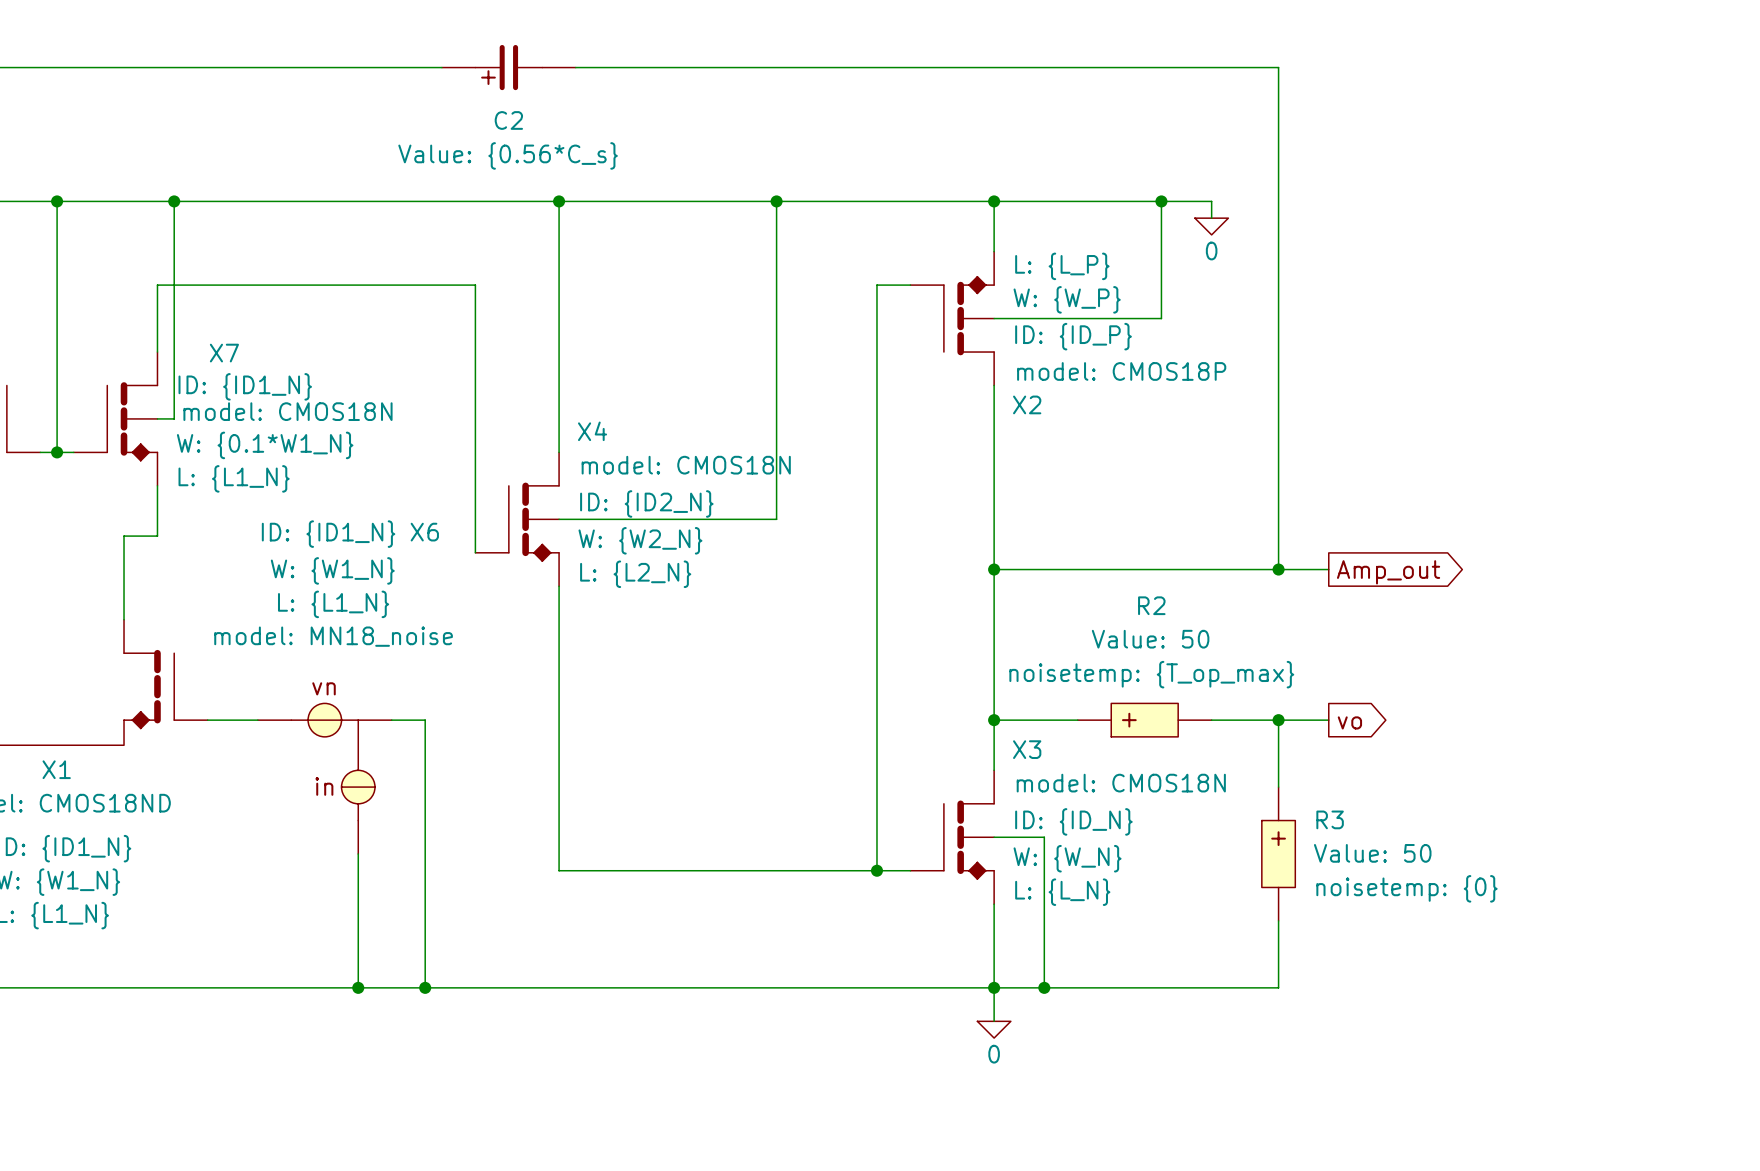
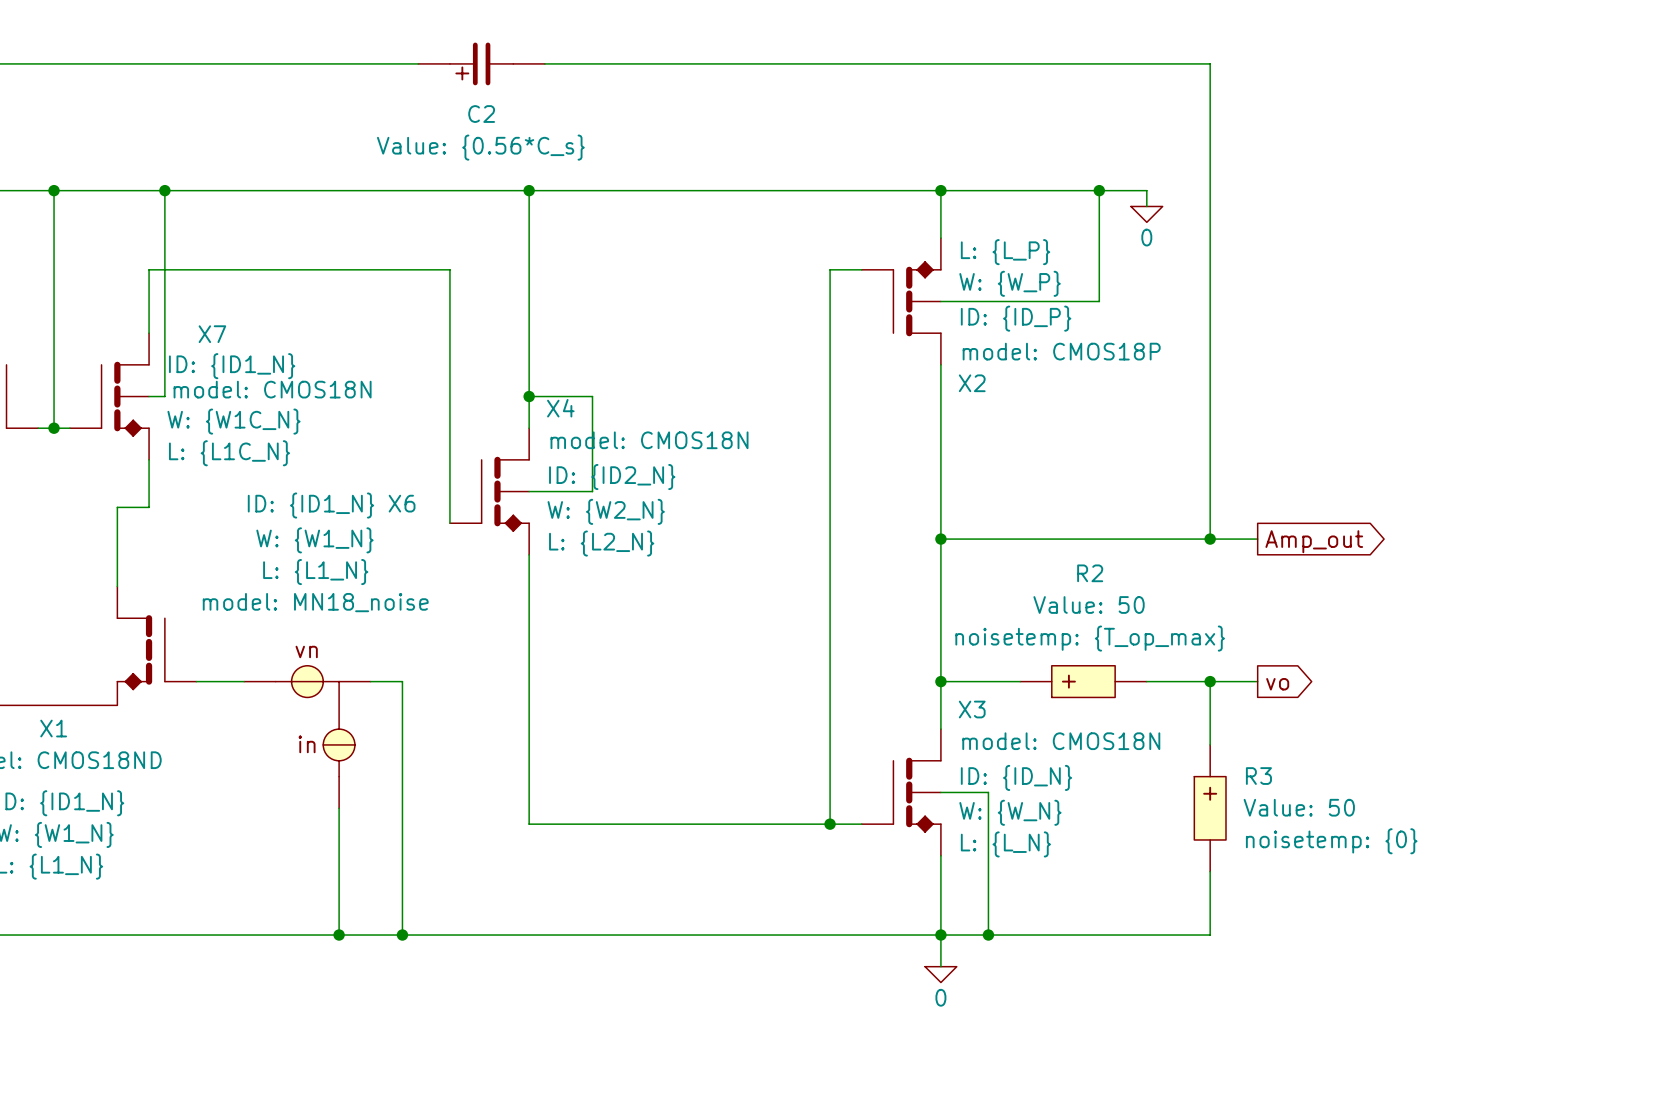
wire: (776, 201) (776, 519) (625, 519) -> (529, 396) (592, 396) (592, 491)
junction: (776, 201) -> none
junction: none -> (529, 396)
X7 text: W: {0.1*W1_N} (265, 445) -> W: {W1C_N} (234, 421)
X7 text: L: {L1_N} (234, 478) -> L: {L1C_N} (229, 453)

